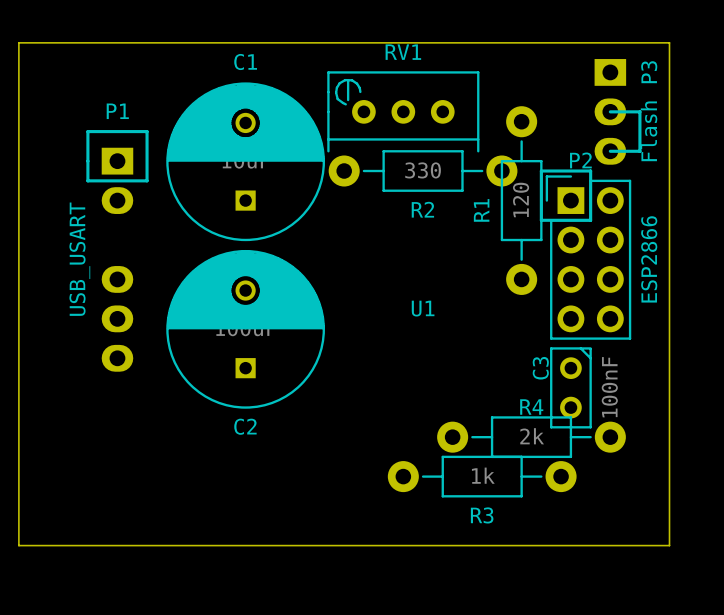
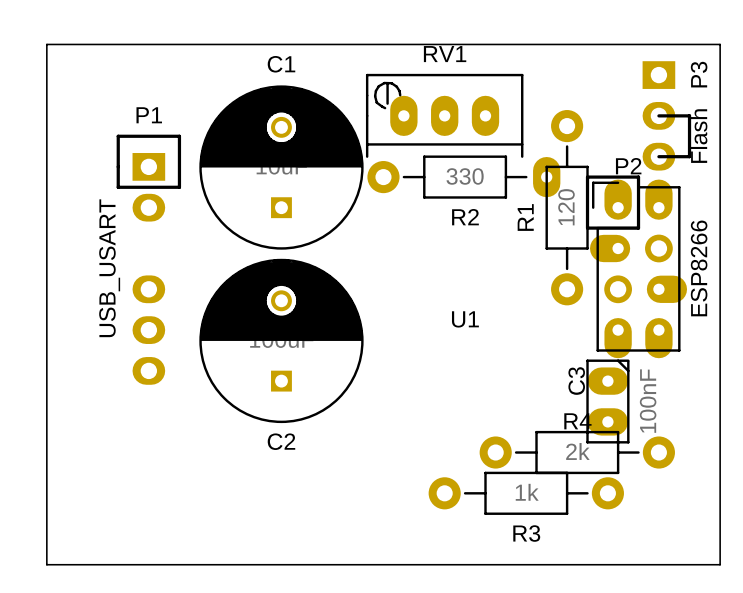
RV1 footprint: [327, 71, 480, 153] -> [365, 73, 524, 158]
R2 footprint: [328, 150, 518, 192] -> [367, 155, 561, 199]
P2 footprint: [545, 175, 632, 340] -> [590, 179, 688, 359]
P2 value: ESP2866 (649, 259) -> ESP8266 (699, 268)
C3 footprint: [550, 347, 592, 429] -> [586, 359, 630, 444]

